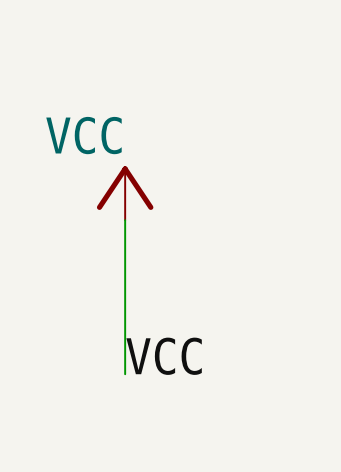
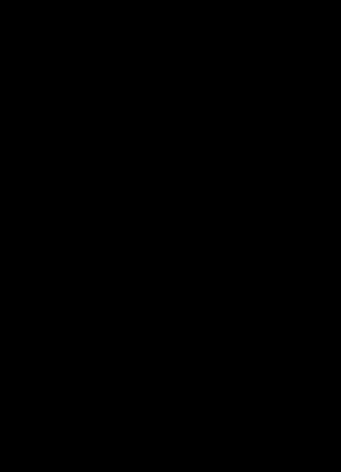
power symbol: VCC (125, 193) -> none
wire: (125, 220) (125, 374) -> none
label: VCC (164, 356) -> none

